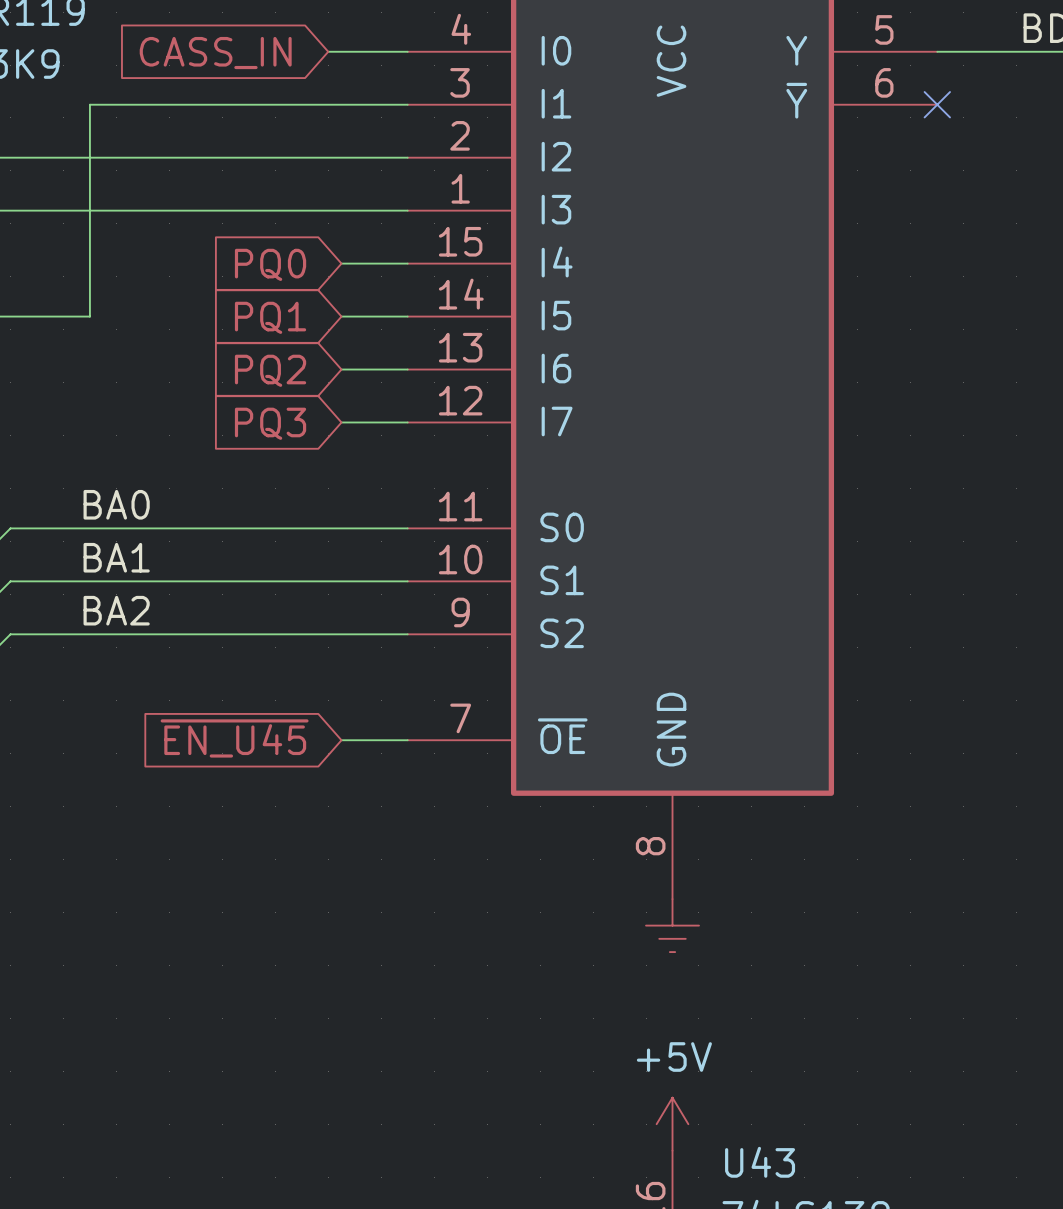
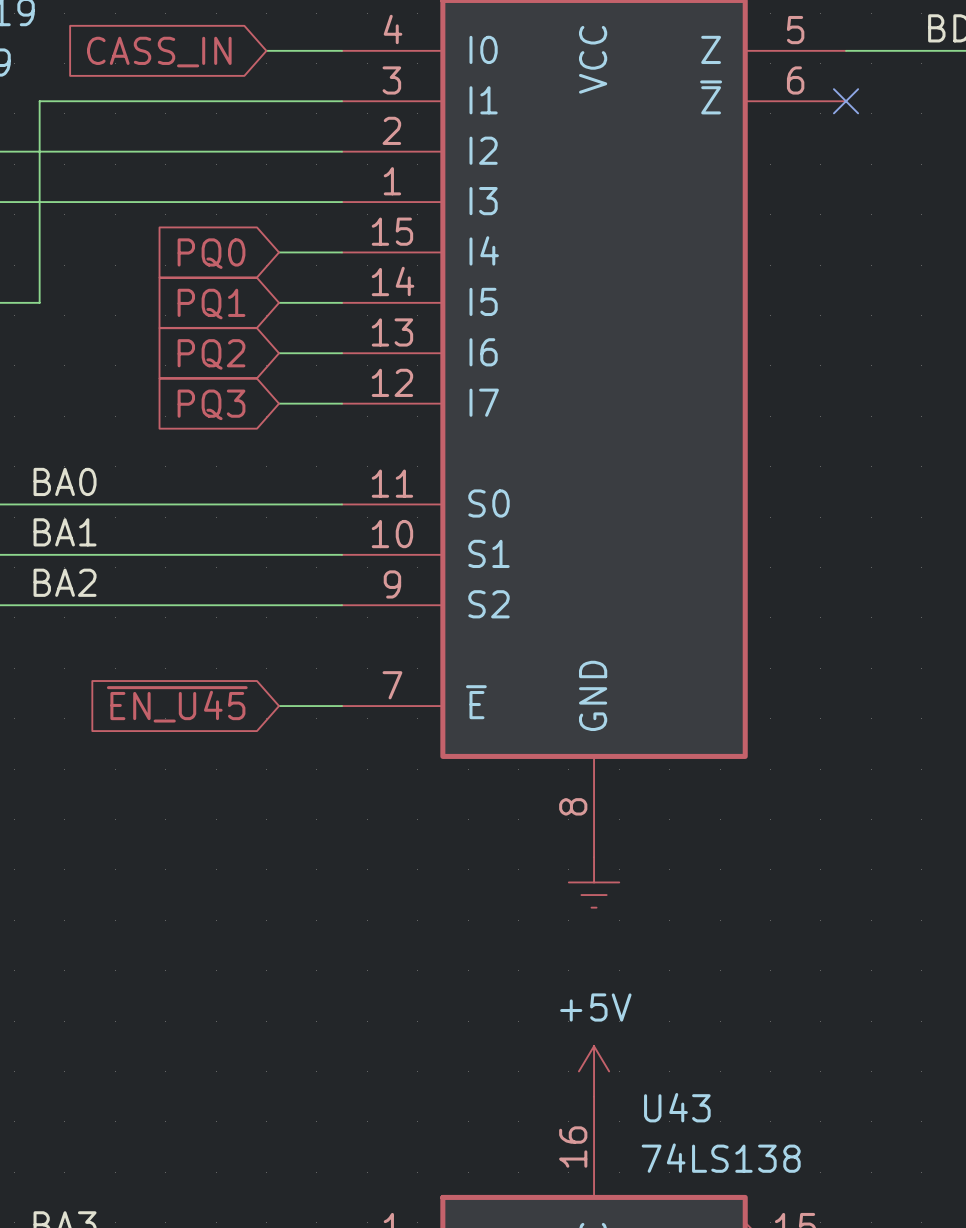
part pin name: Y (796, 50) -> Z (711, 49)
part pin name: ~{Y} (796, 100) -> ~{Z} (711, 97)
part pin name: ~{OE} (562, 736) -> ~{E} (476, 702)

